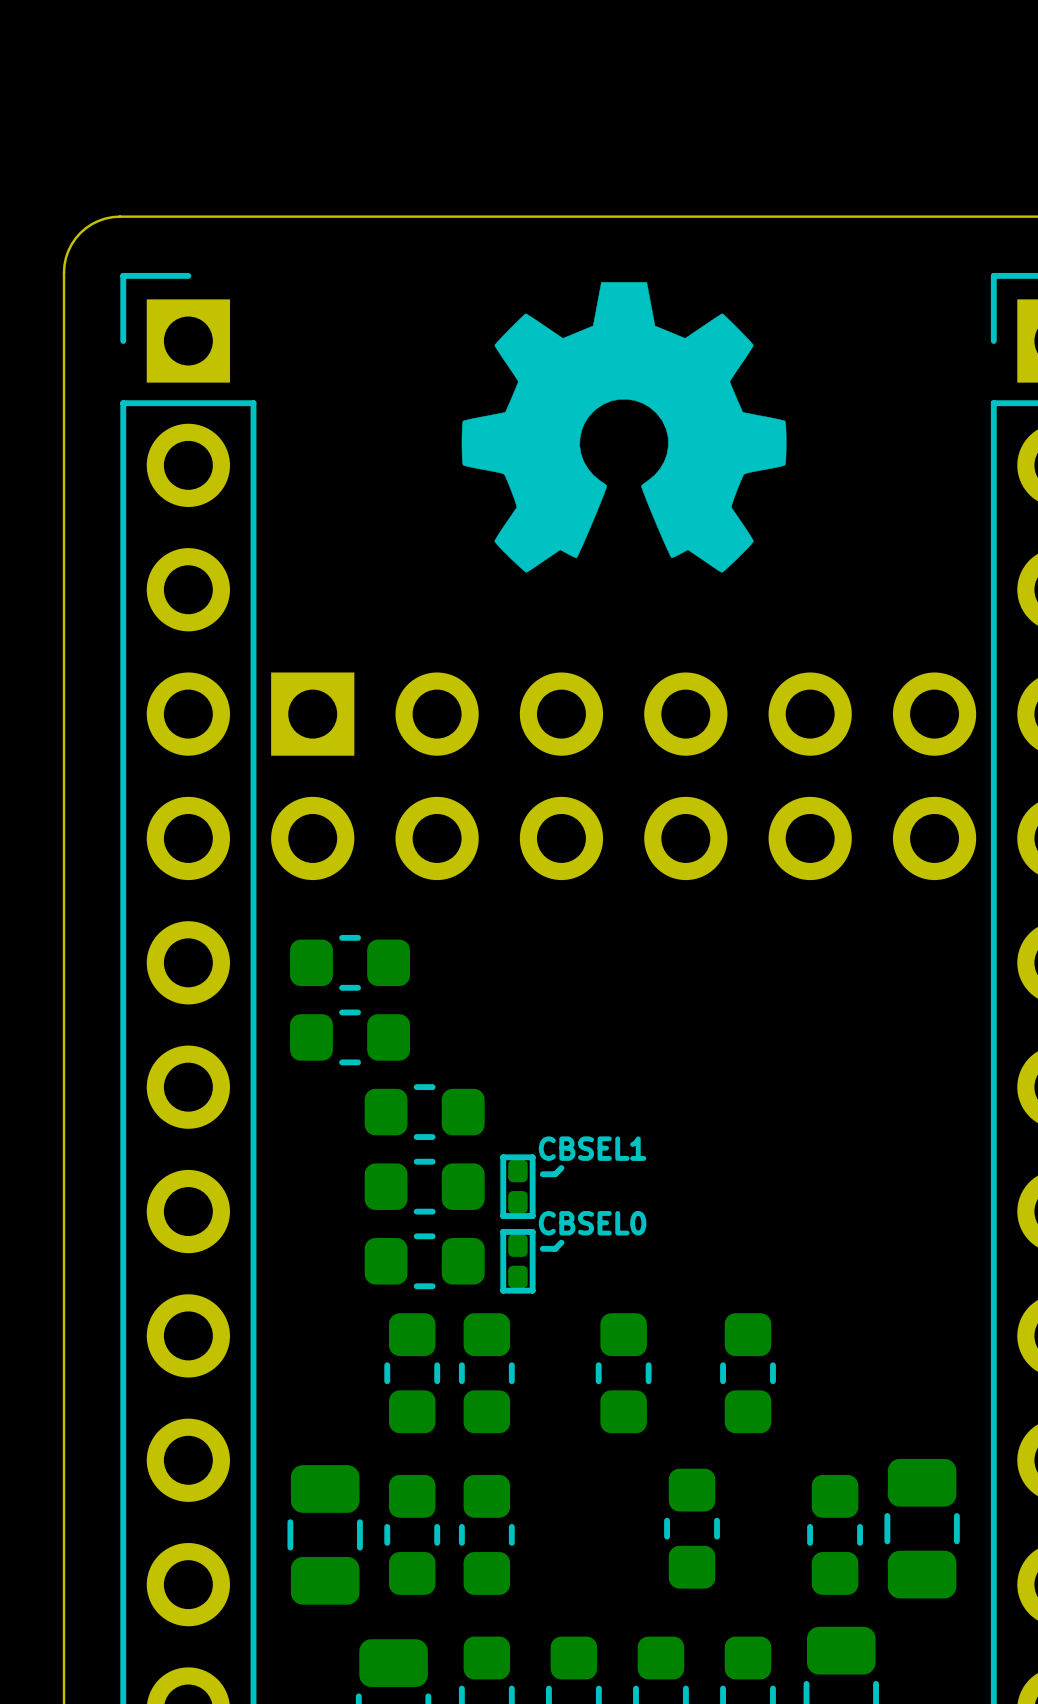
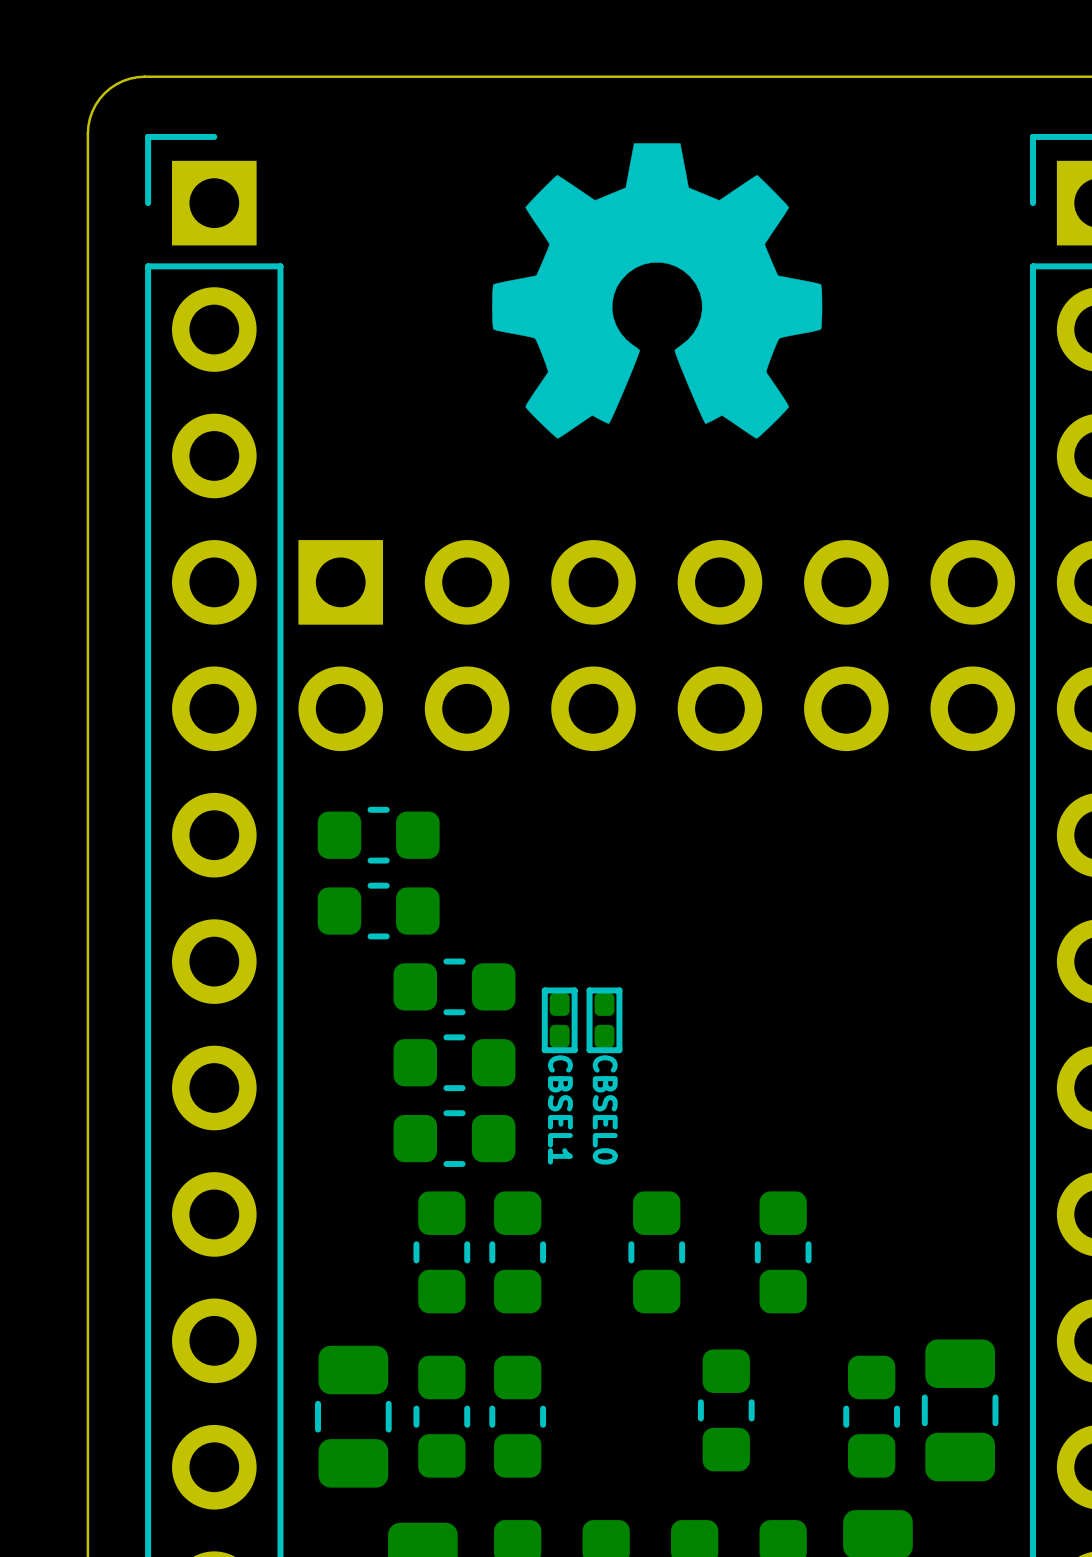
part: none -> (559, 1020)
part: none -> (604, 1020)
text rotation: 0° (592, 1148) -> 90° clockwise (560, 1109)
line: (561, 1168) (555, 1174) (542, 1174) -> none
part: (517, 1186) -> none
text rotation: 0° (592, 1223) -> 90° clockwise (605, 1109)
line: (561, 1242) (555, 1248) (542, 1248) -> none
part: (517, 1261) -> none

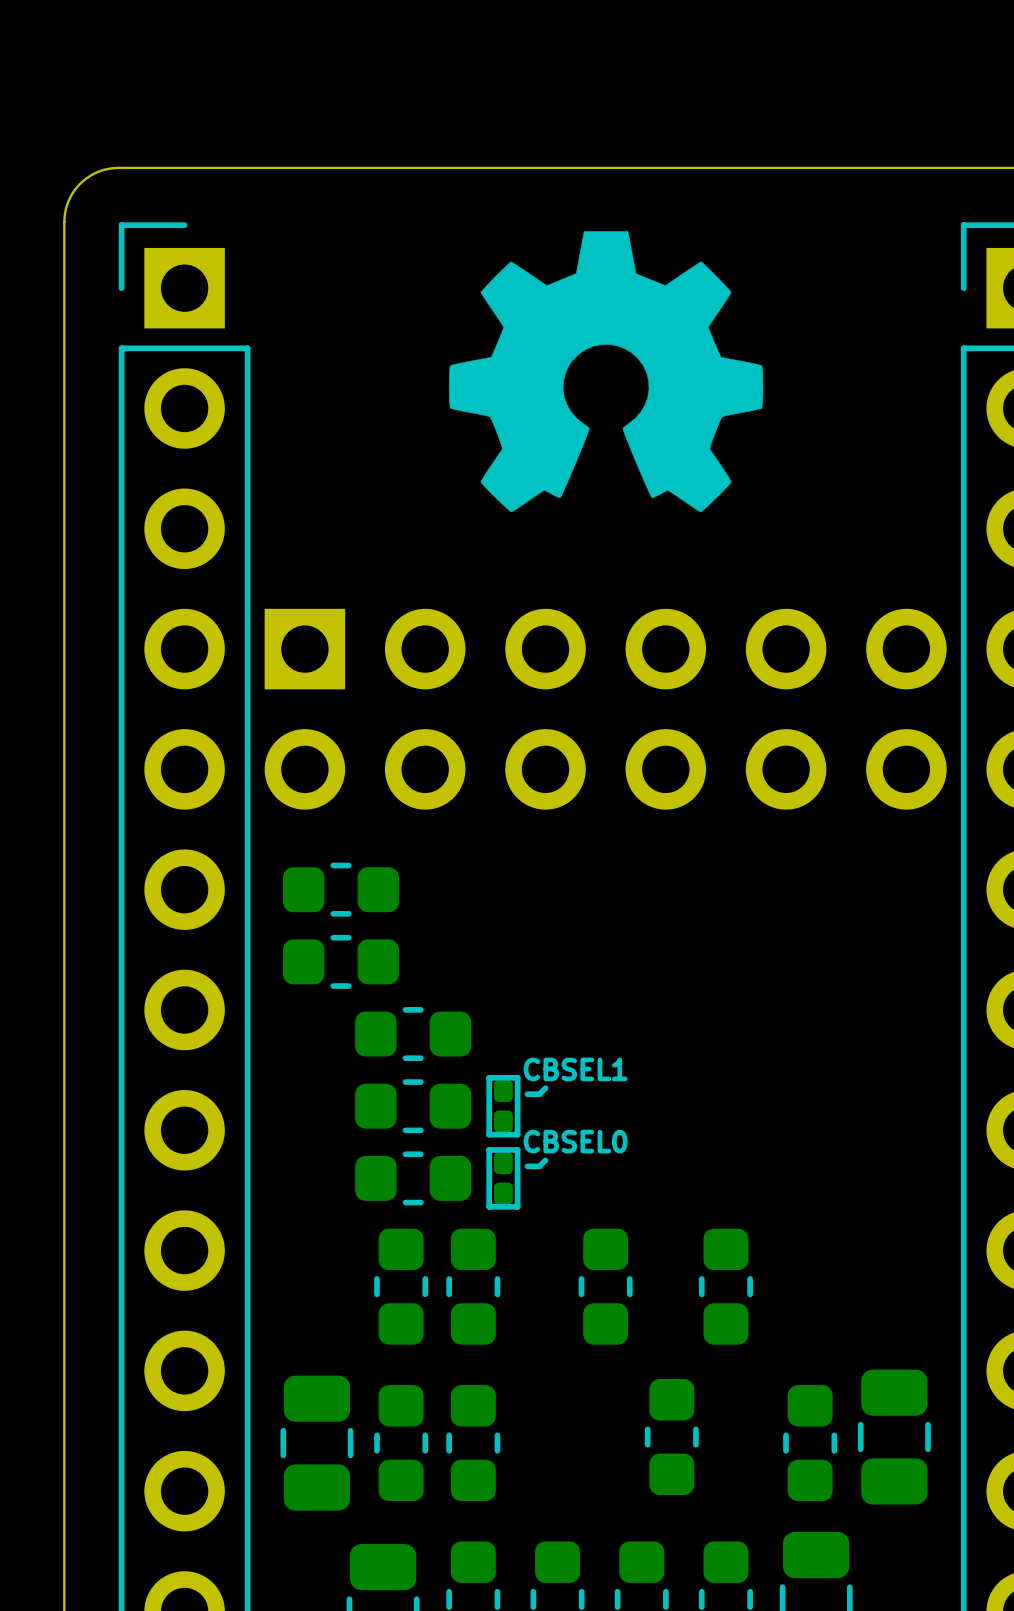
part: (559, 1020) -> none
part: (604, 1020) -> none
line: none -> (545, 1088) (539, 1094) (527, 1094)
part: none -> (503, 1106)
text rotation: 0° (560, 1109) -> 90° counterclockwise (575, 1069)
text rotation: 0° (605, 1109) -> 90° counterclockwise (575, 1141)
line: none -> (545, 1160) (539, 1166) (527, 1166)
part: none -> (503, 1178)

